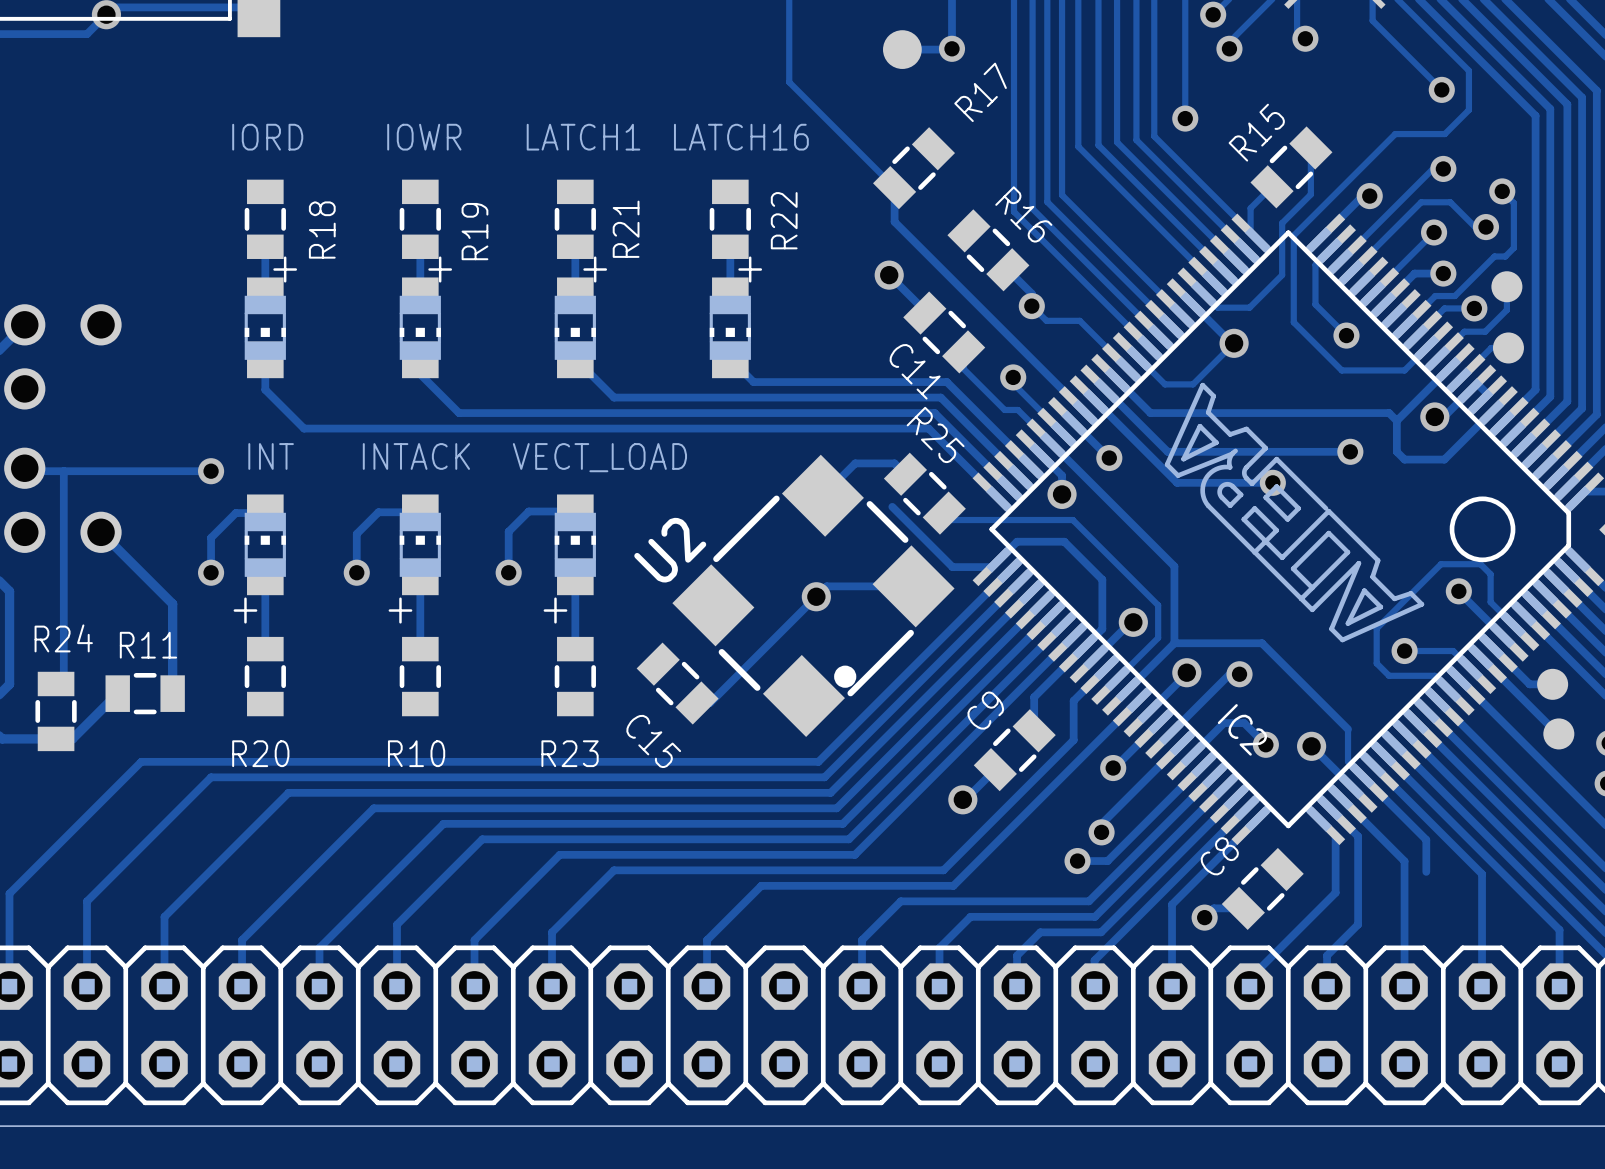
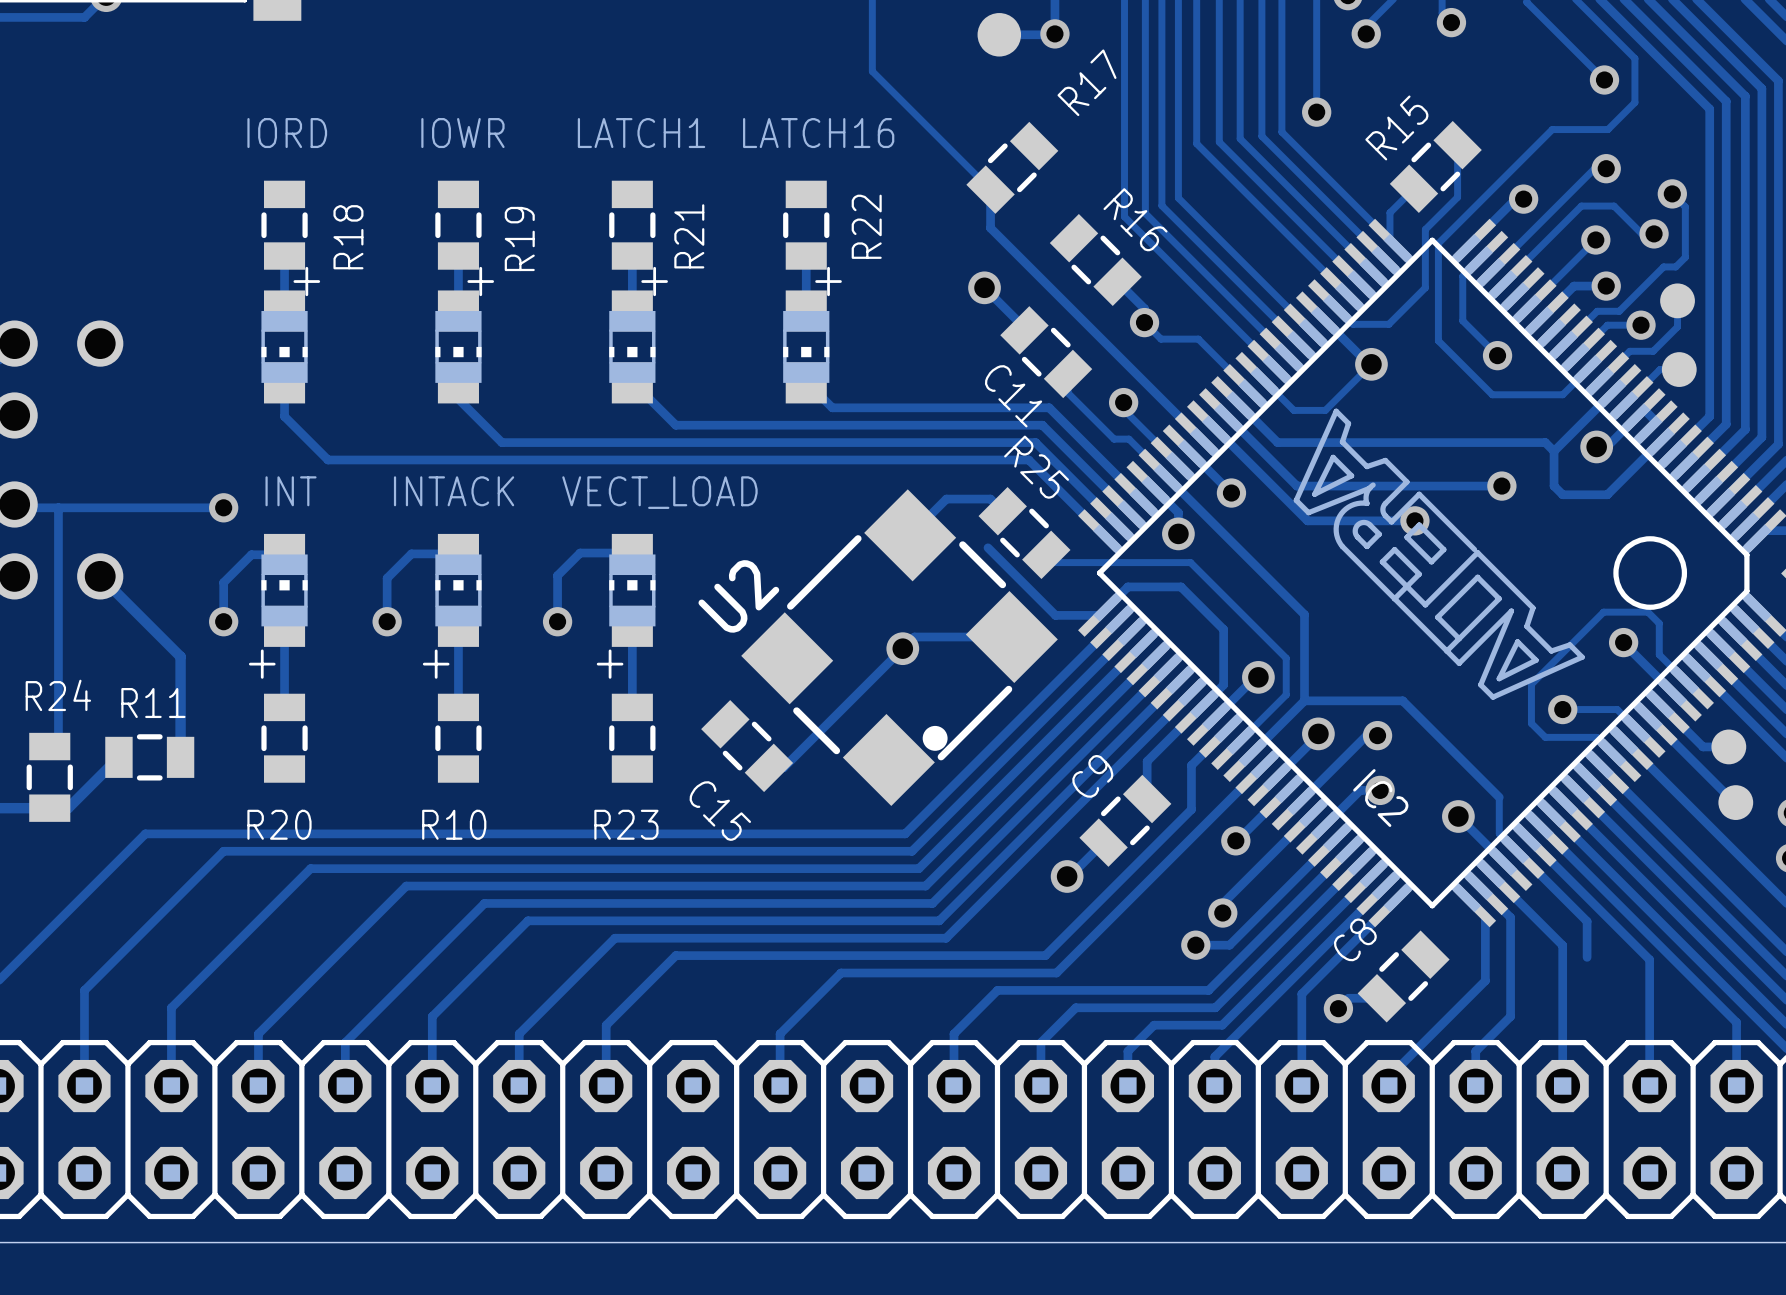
track: (1241, 723) (1244, 723) (1265, 744) -> none
via position: (1265, 744) -> (1380, 790)

